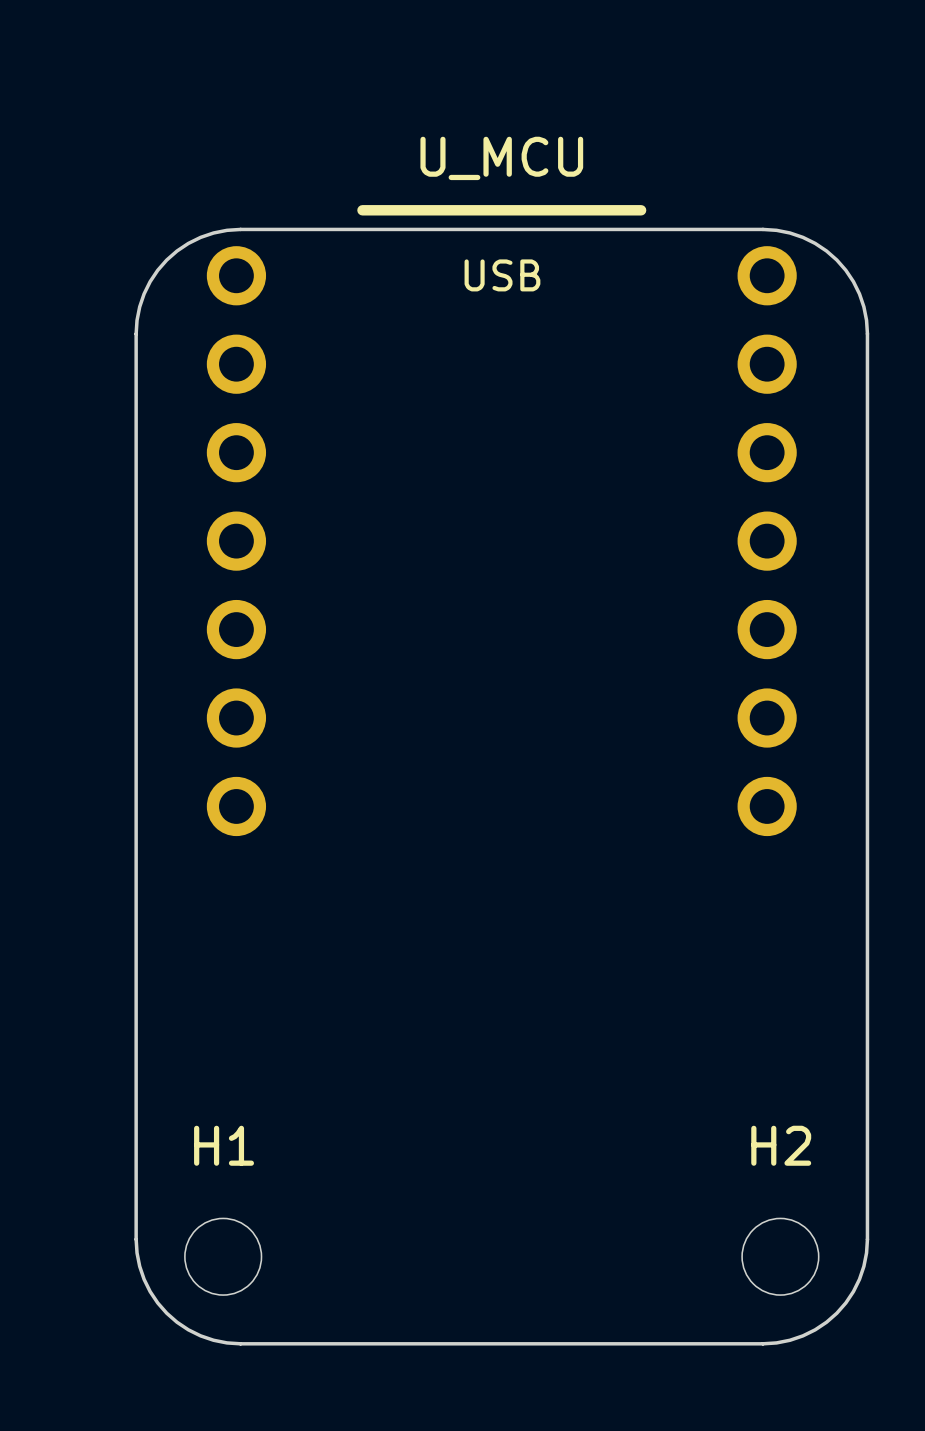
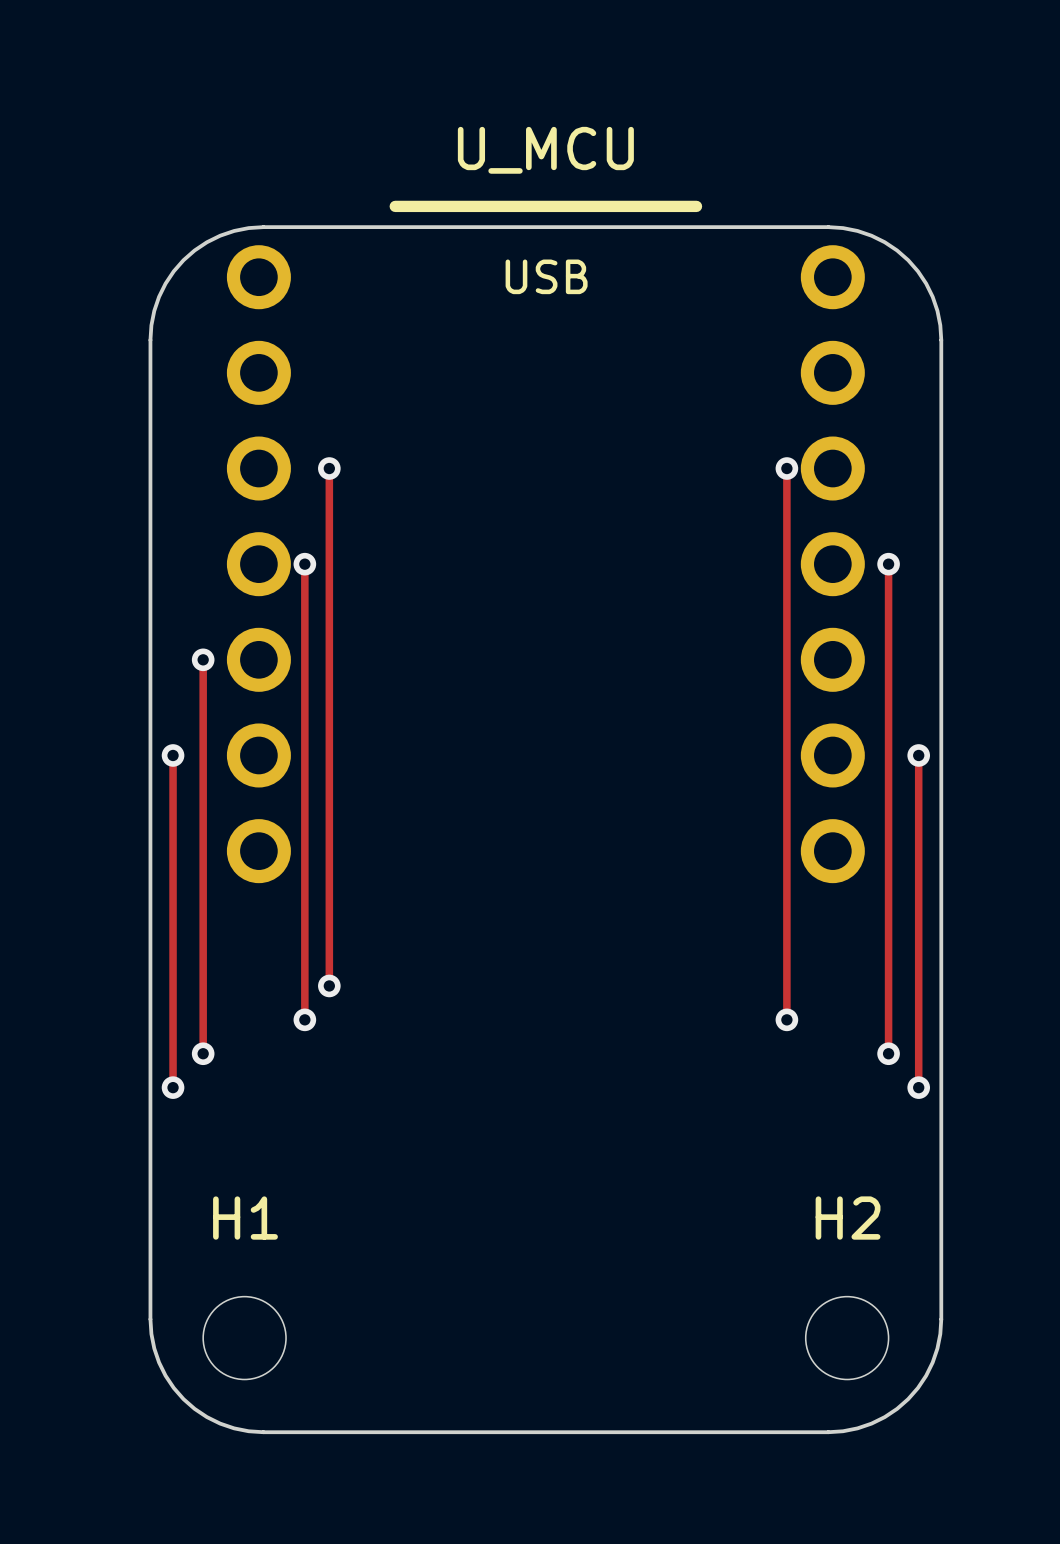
track: none -> (329, 468) (329, 985)
via: none -> (329, 468)
track: none -> (786, 468) (786, 1019)
via: none -> (786, 468)
track: none -> (304, 564) (304, 1019)
via: none -> (304, 564)
track: none -> (888, 564) (888, 1053)
via: none -> (888, 564)
track: none -> (203, 659) (203, 1053)
via: none -> (203, 659)
track: none -> (173, 755) (173, 1087)
via: none -> (173, 755)
track: none -> (918, 755) (918, 1087)
via: none -> (918, 755)
via: none -> (329, 985)
via: none -> (304, 1019)
via: none -> (786, 1019)
via: none -> (203, 1053)
via: none -> (888, 1053)
via: none -> (173, 1087)
via: none -> (918, 1087)

